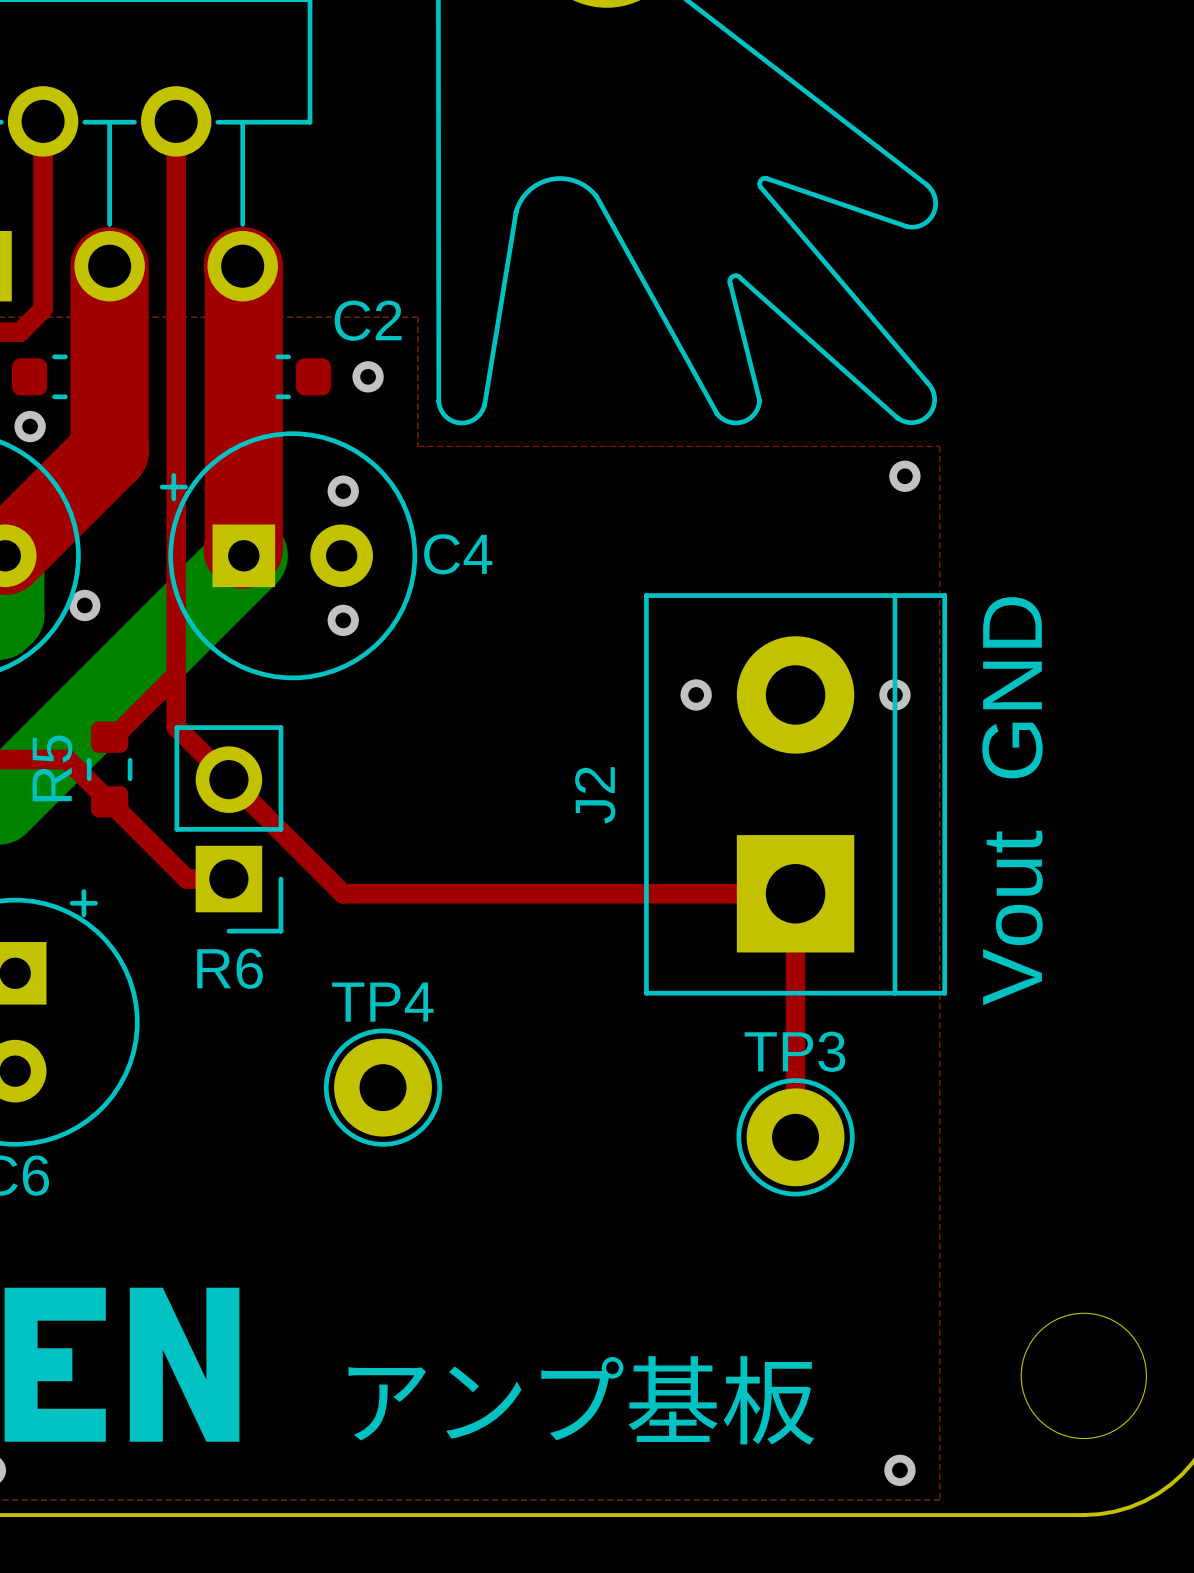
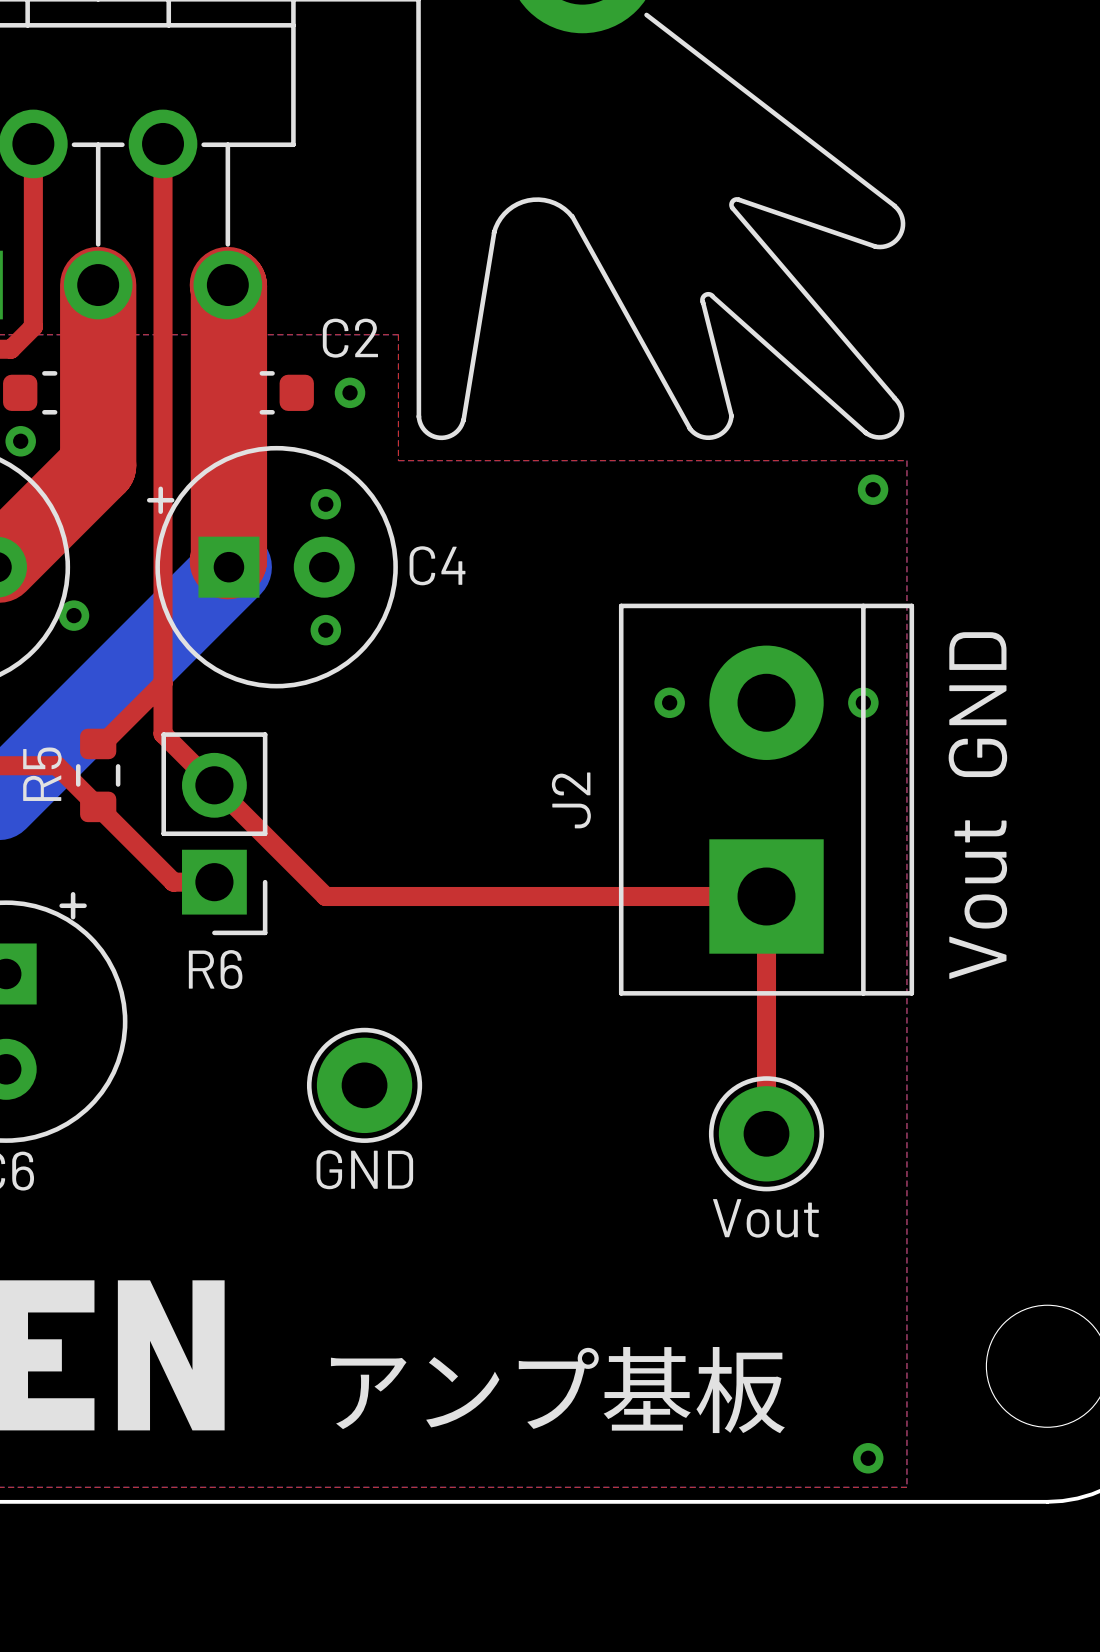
TP4 name: TP4 (382, 1002) -> none
TP3 name: TP3 (794, 1051) -> none
TP4 value: none -> GND (364, 1169)
TP3 value: none -> Vout (765, 1218)

